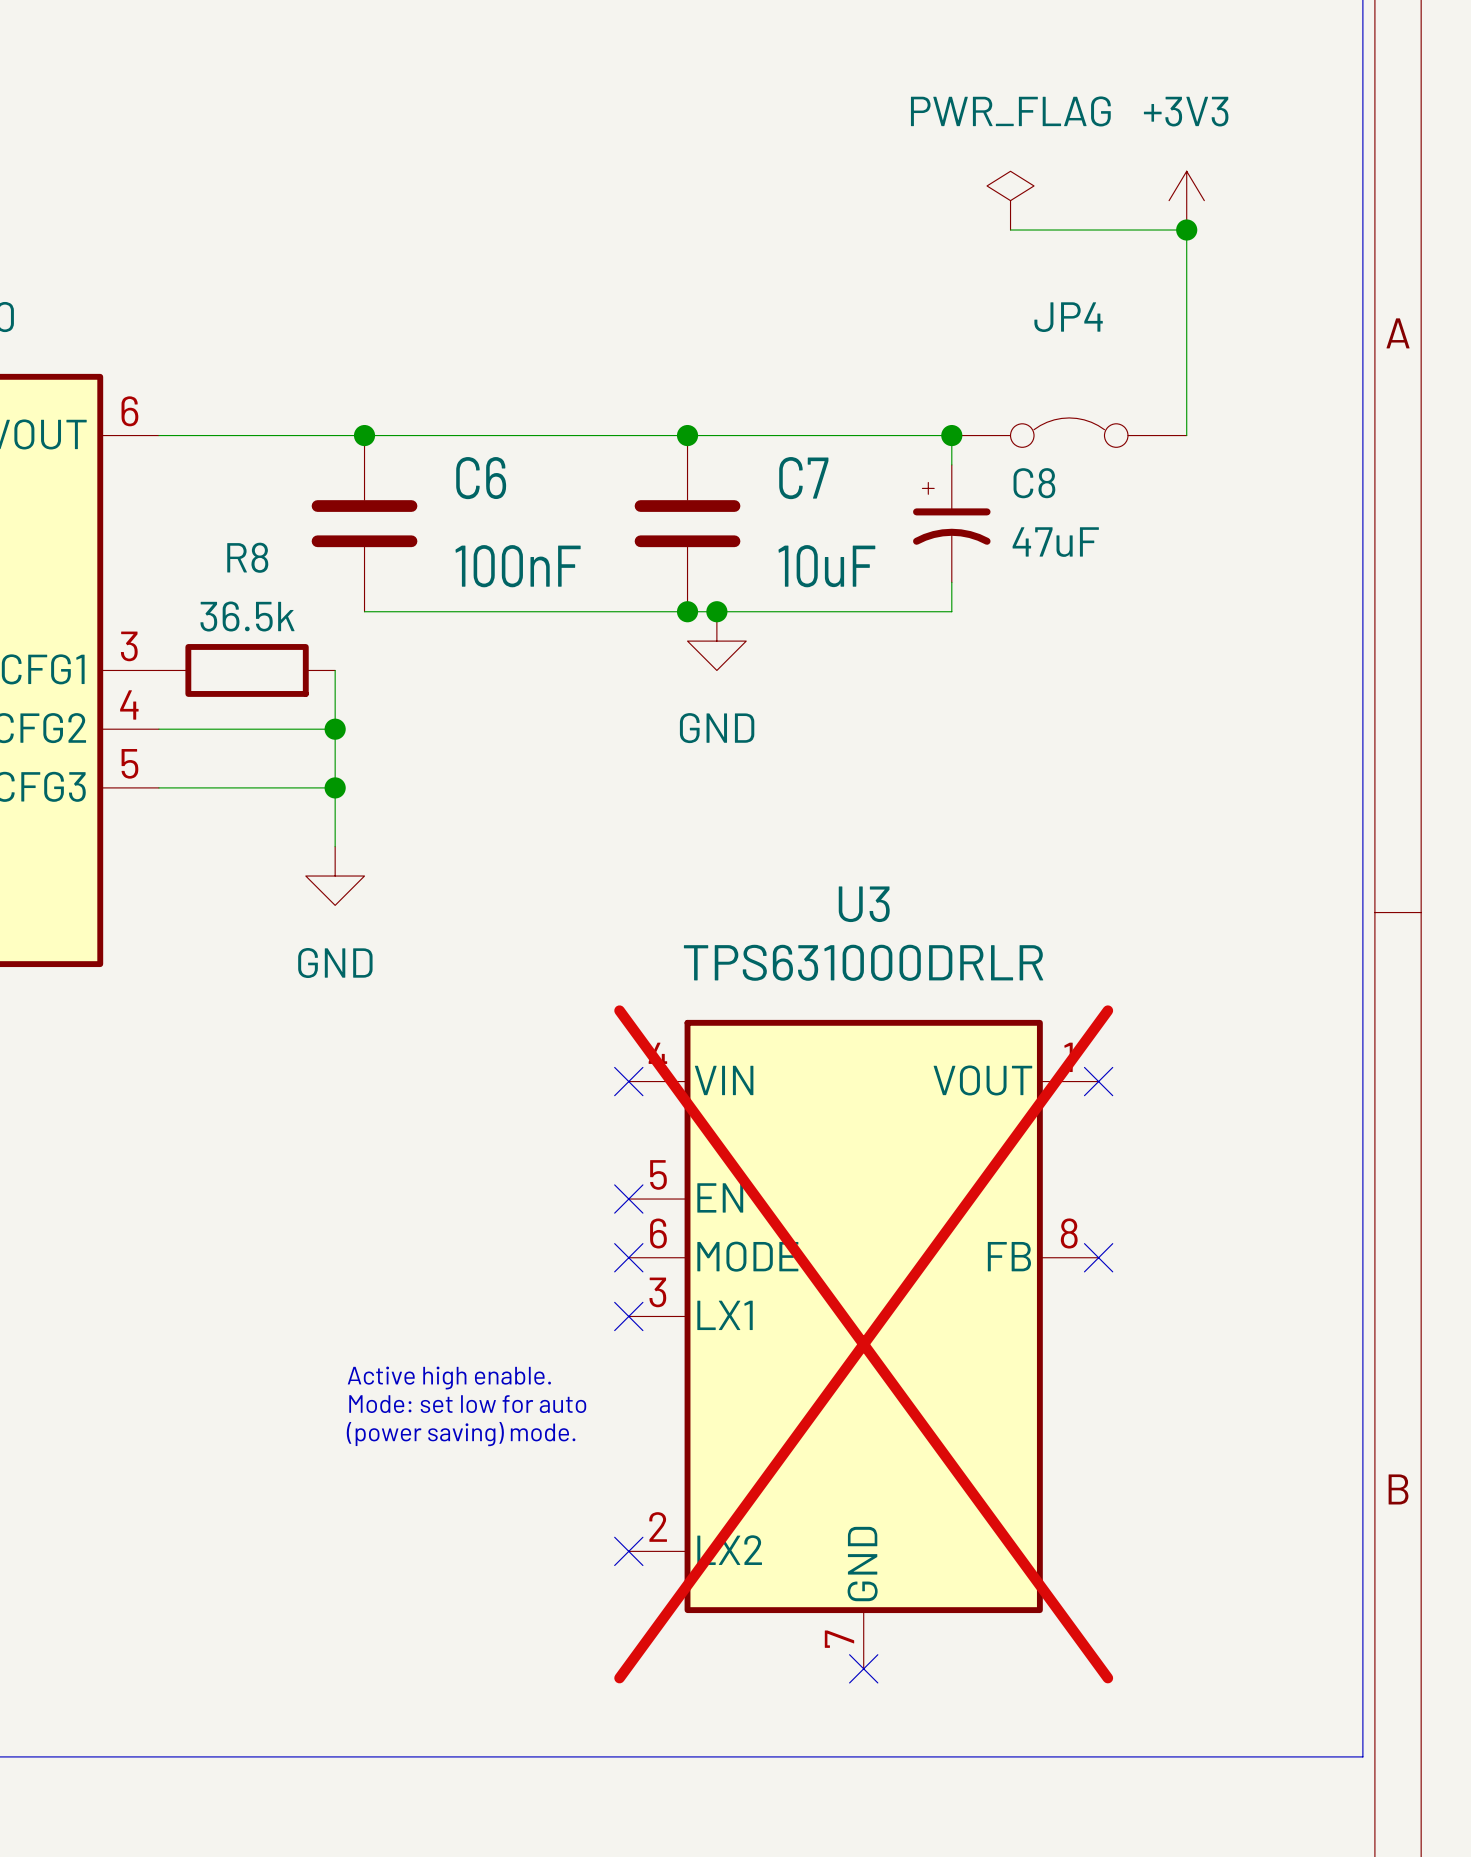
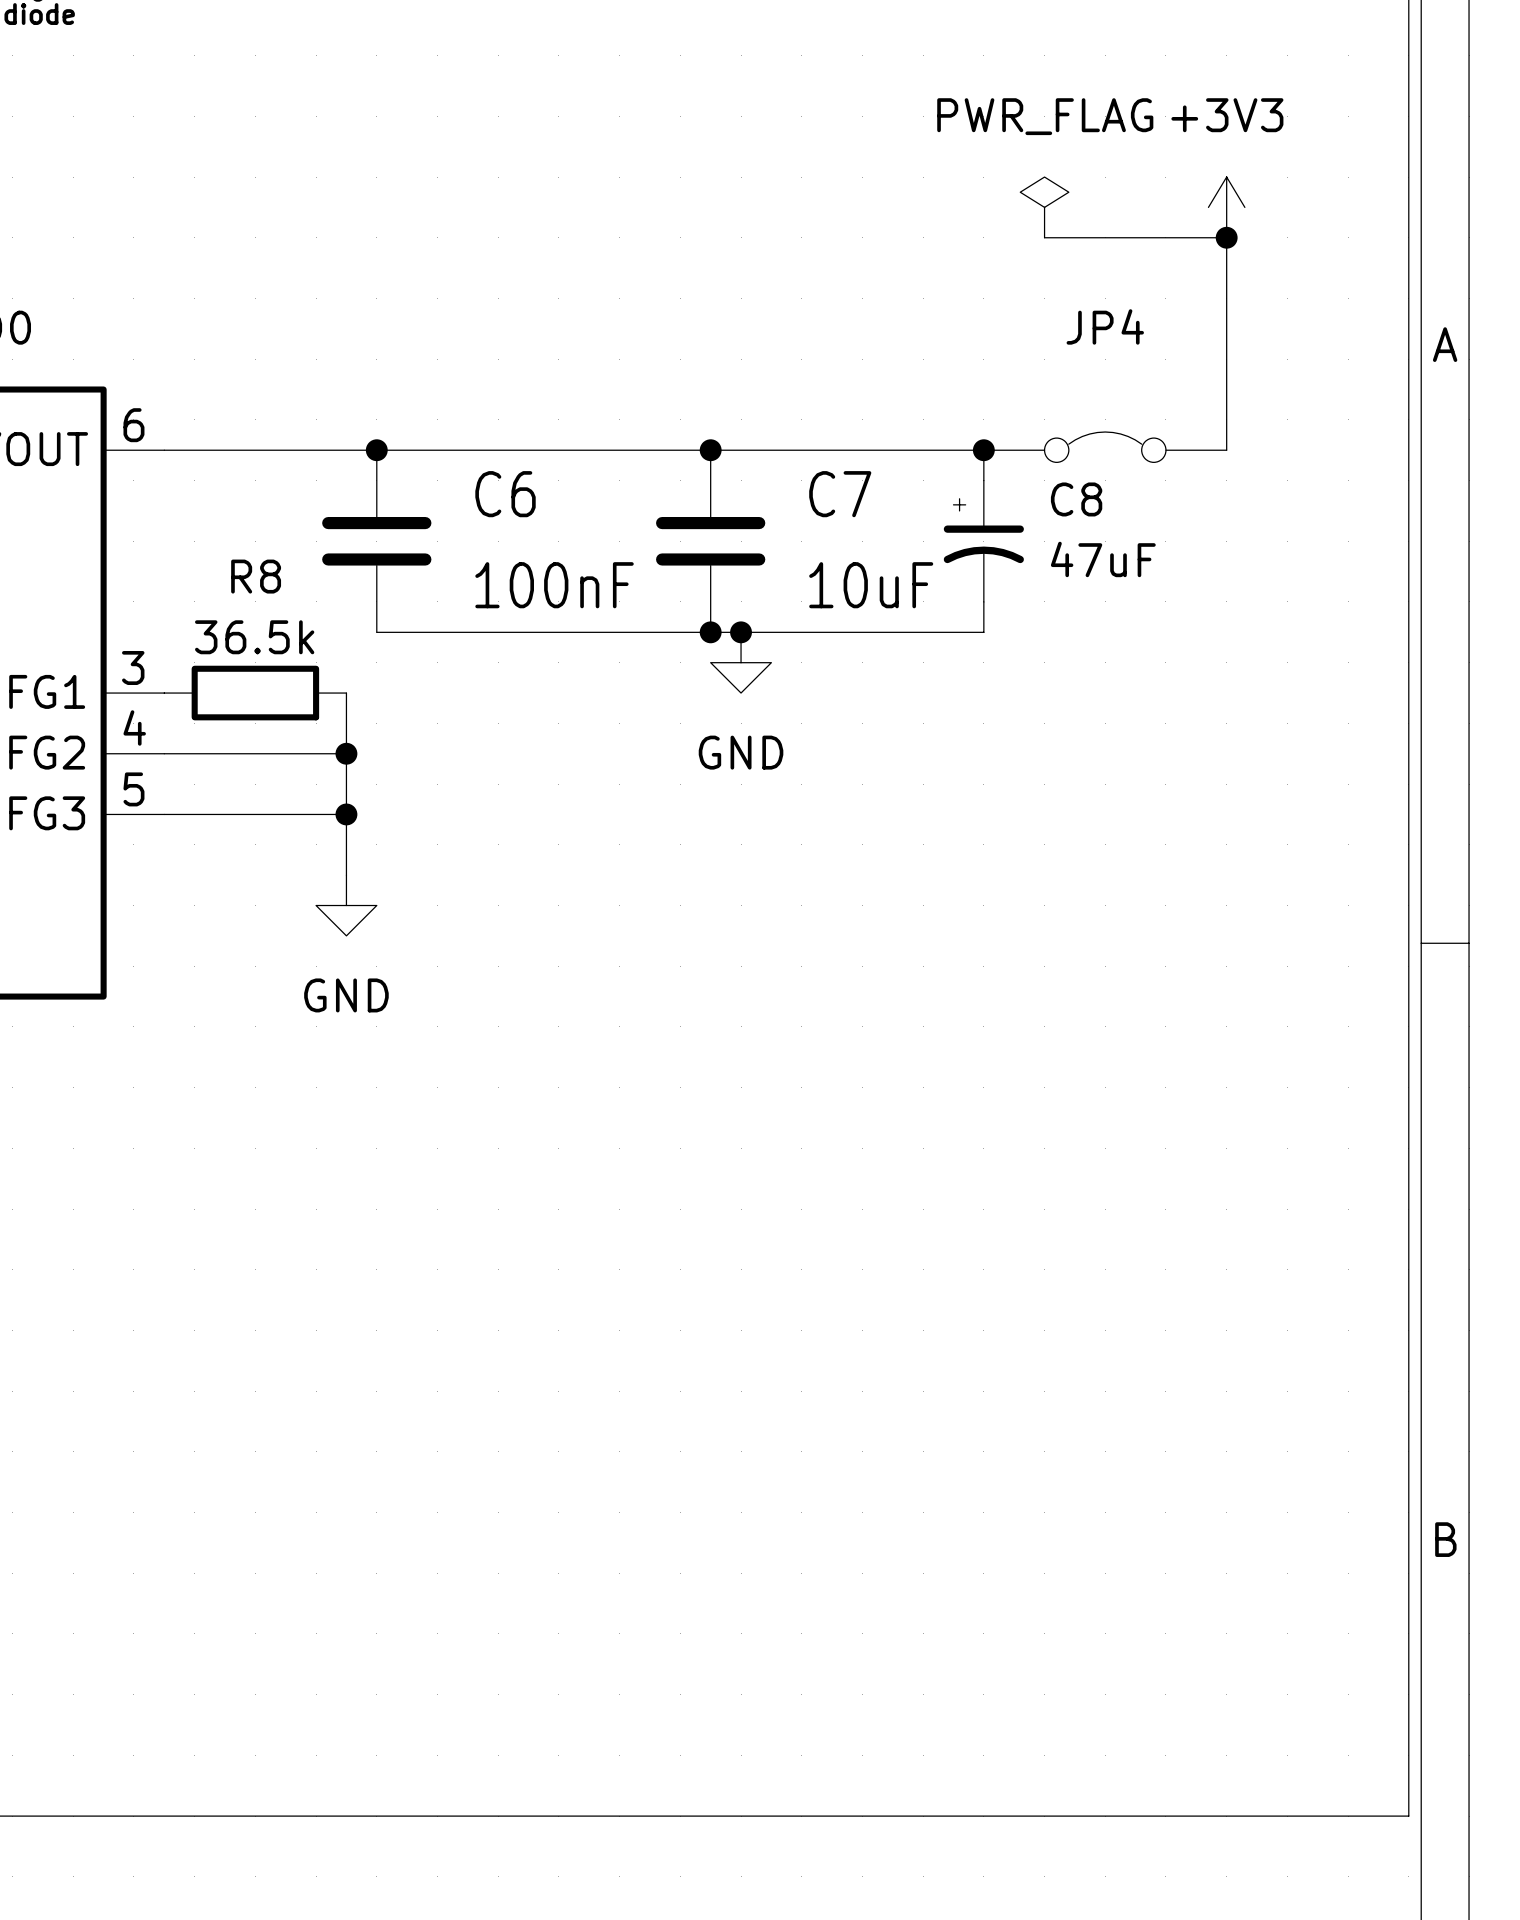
no-connect mark: (628, 1081) -> none
no-connect mark: (1098, 1081) -> none
no-connect mark: (628, 1199) -> none
no-connect mark: (628, 1257) -> none
no-connect mark: (1098, 1257) -> none
no-connect mark: (628, 1316) -> none
U3: TPS631000DRLR (863, 1344) -> none
text: Active high enable. (449, 1378) -> none
text: Mode: set low for auto (467, 1404) -> none
text: (power saving) mode. (461, 1434) -> none
no-connect mark: (628, 1551) -> none
no-connect mark: (863, 1668) -> none

